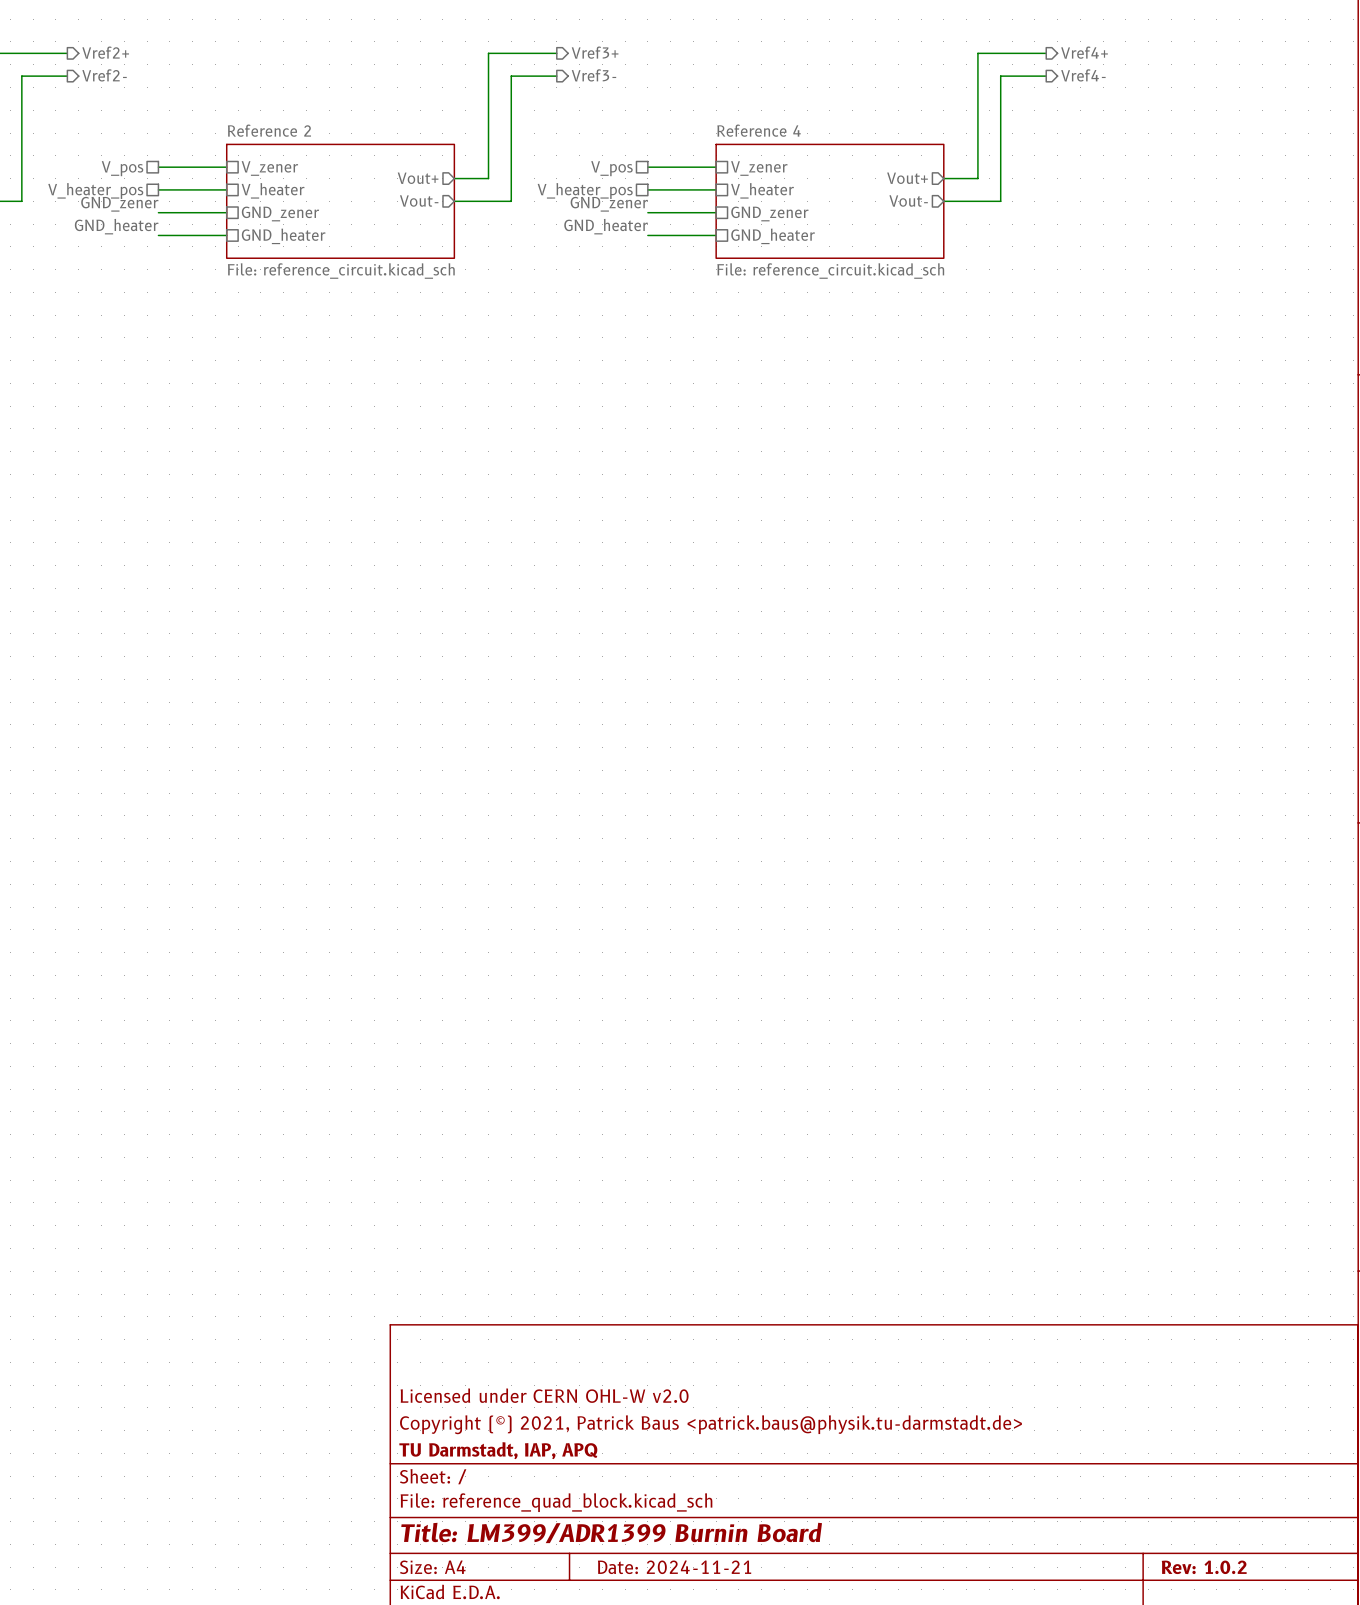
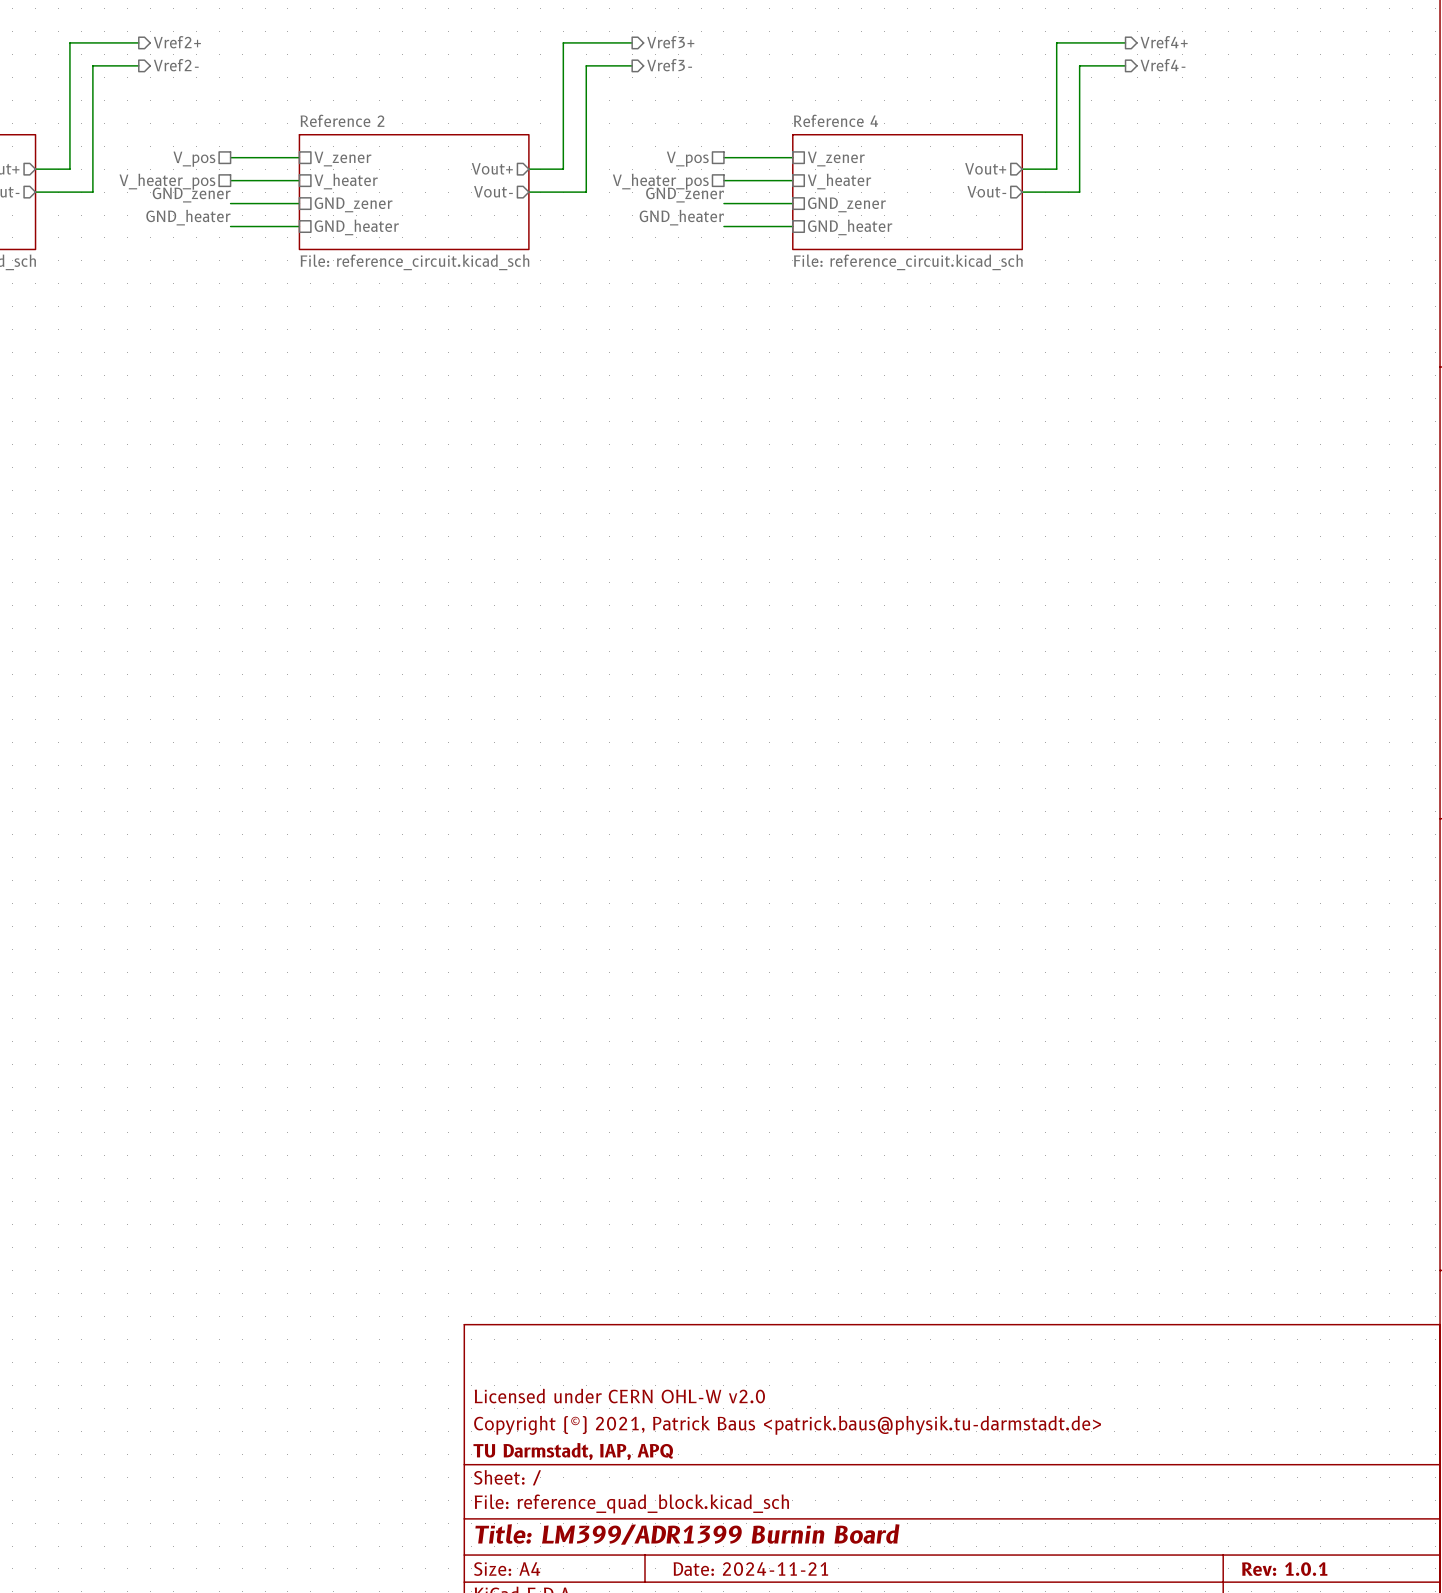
title block: Rev: 1.0.2 (1204, 1567) -> Rev: 1.0.1 (1284, 1569)

